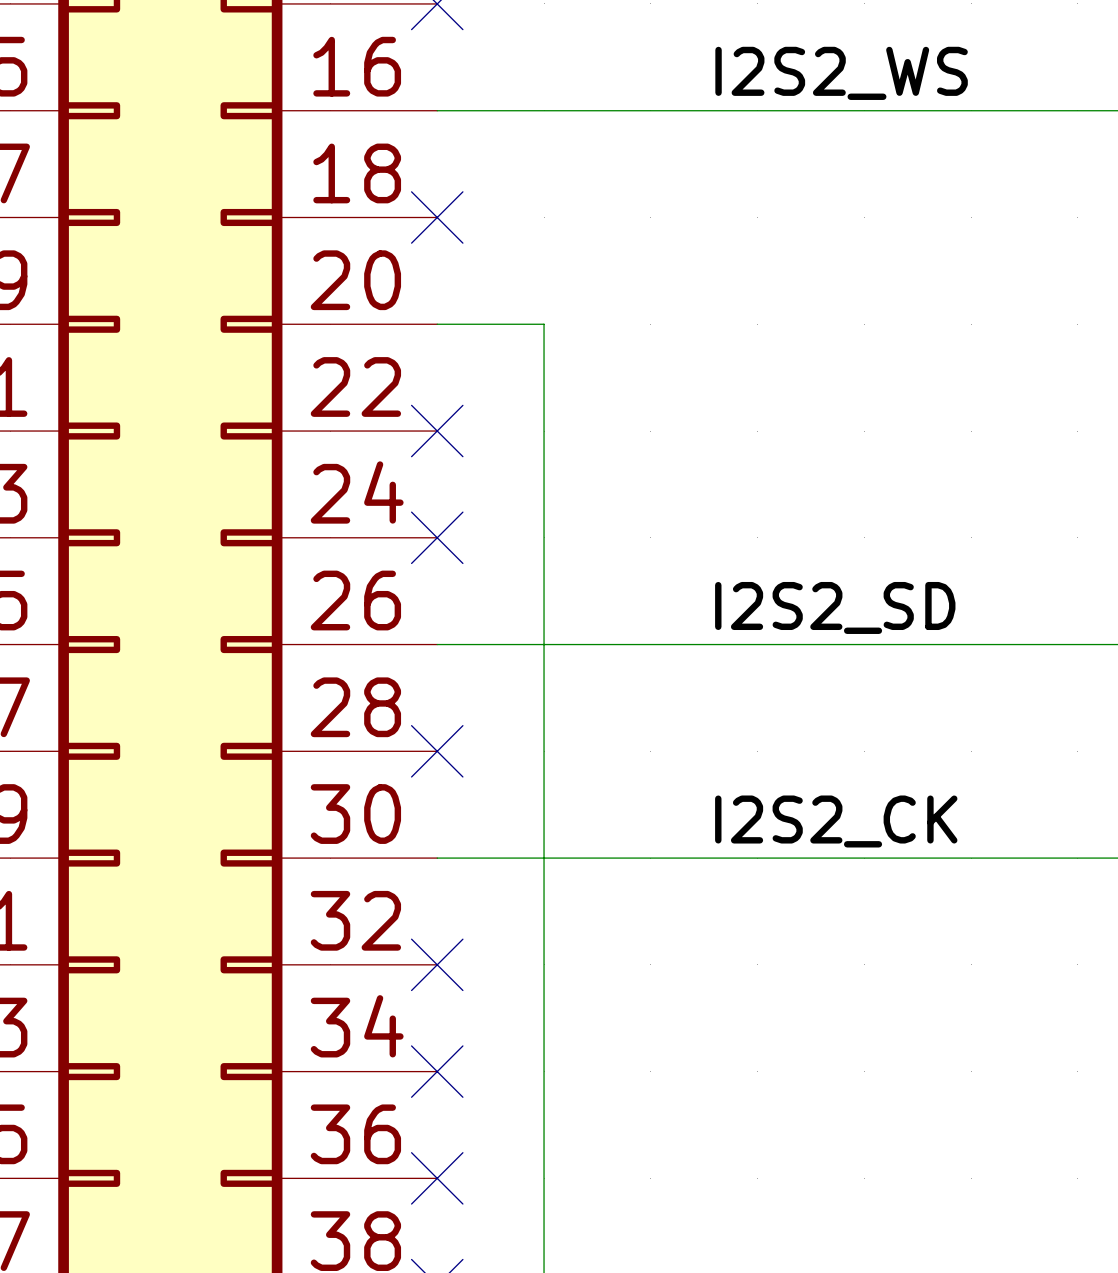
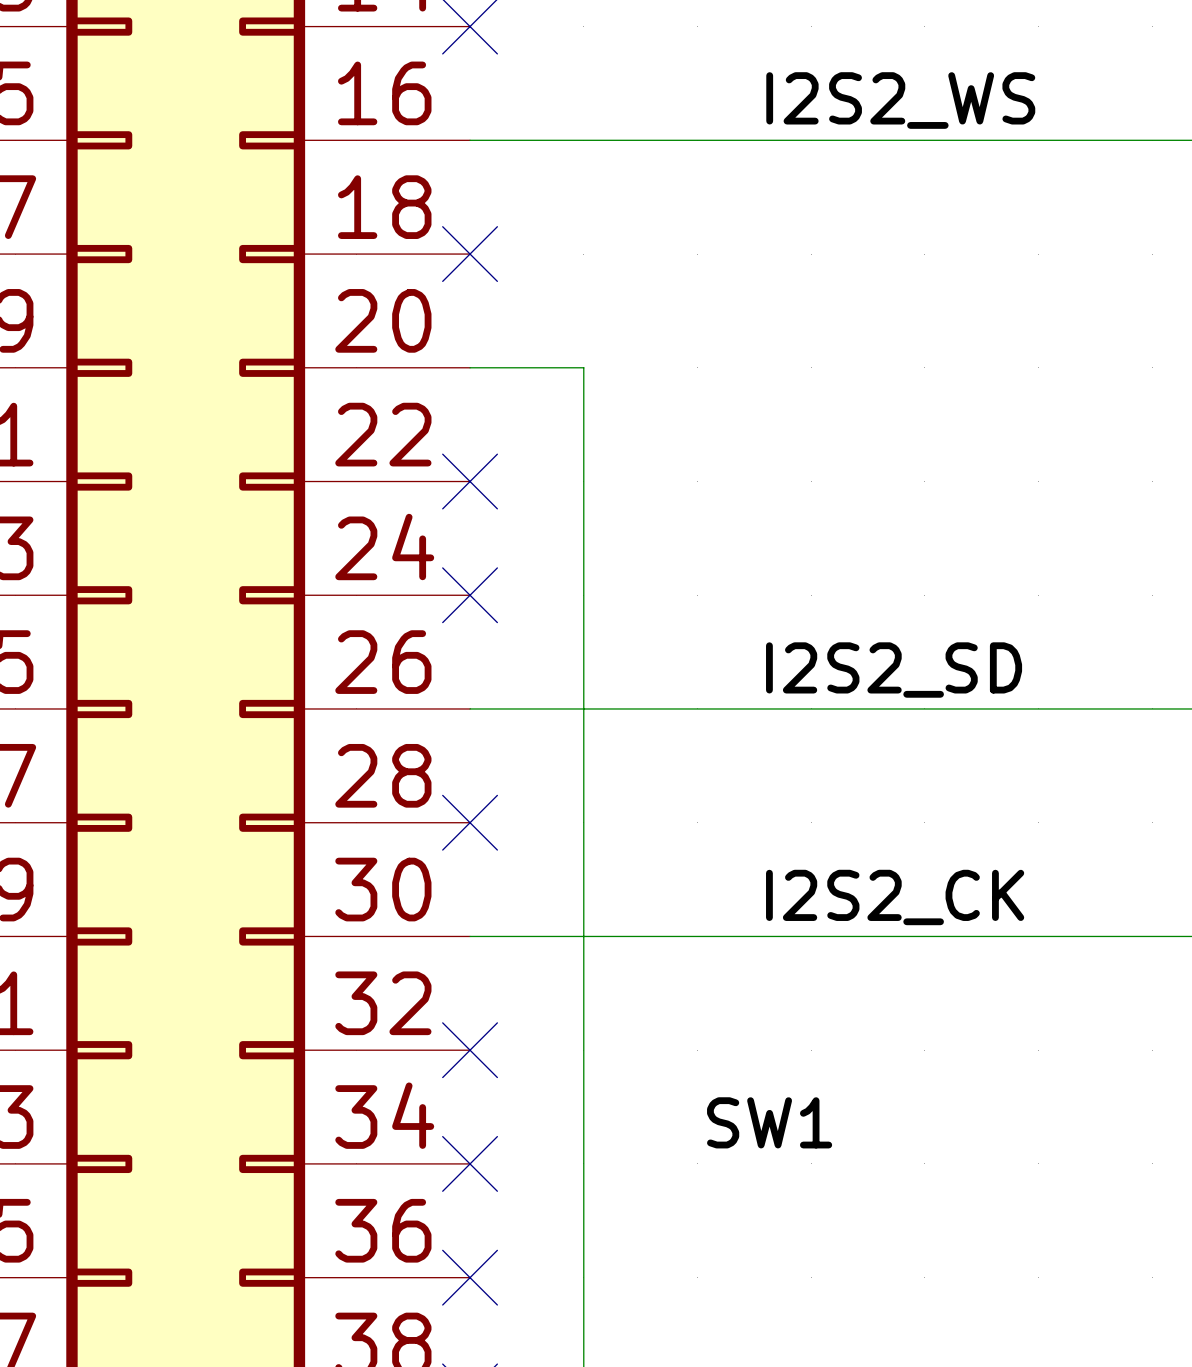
label: none -> SW1 (769, 1122)

